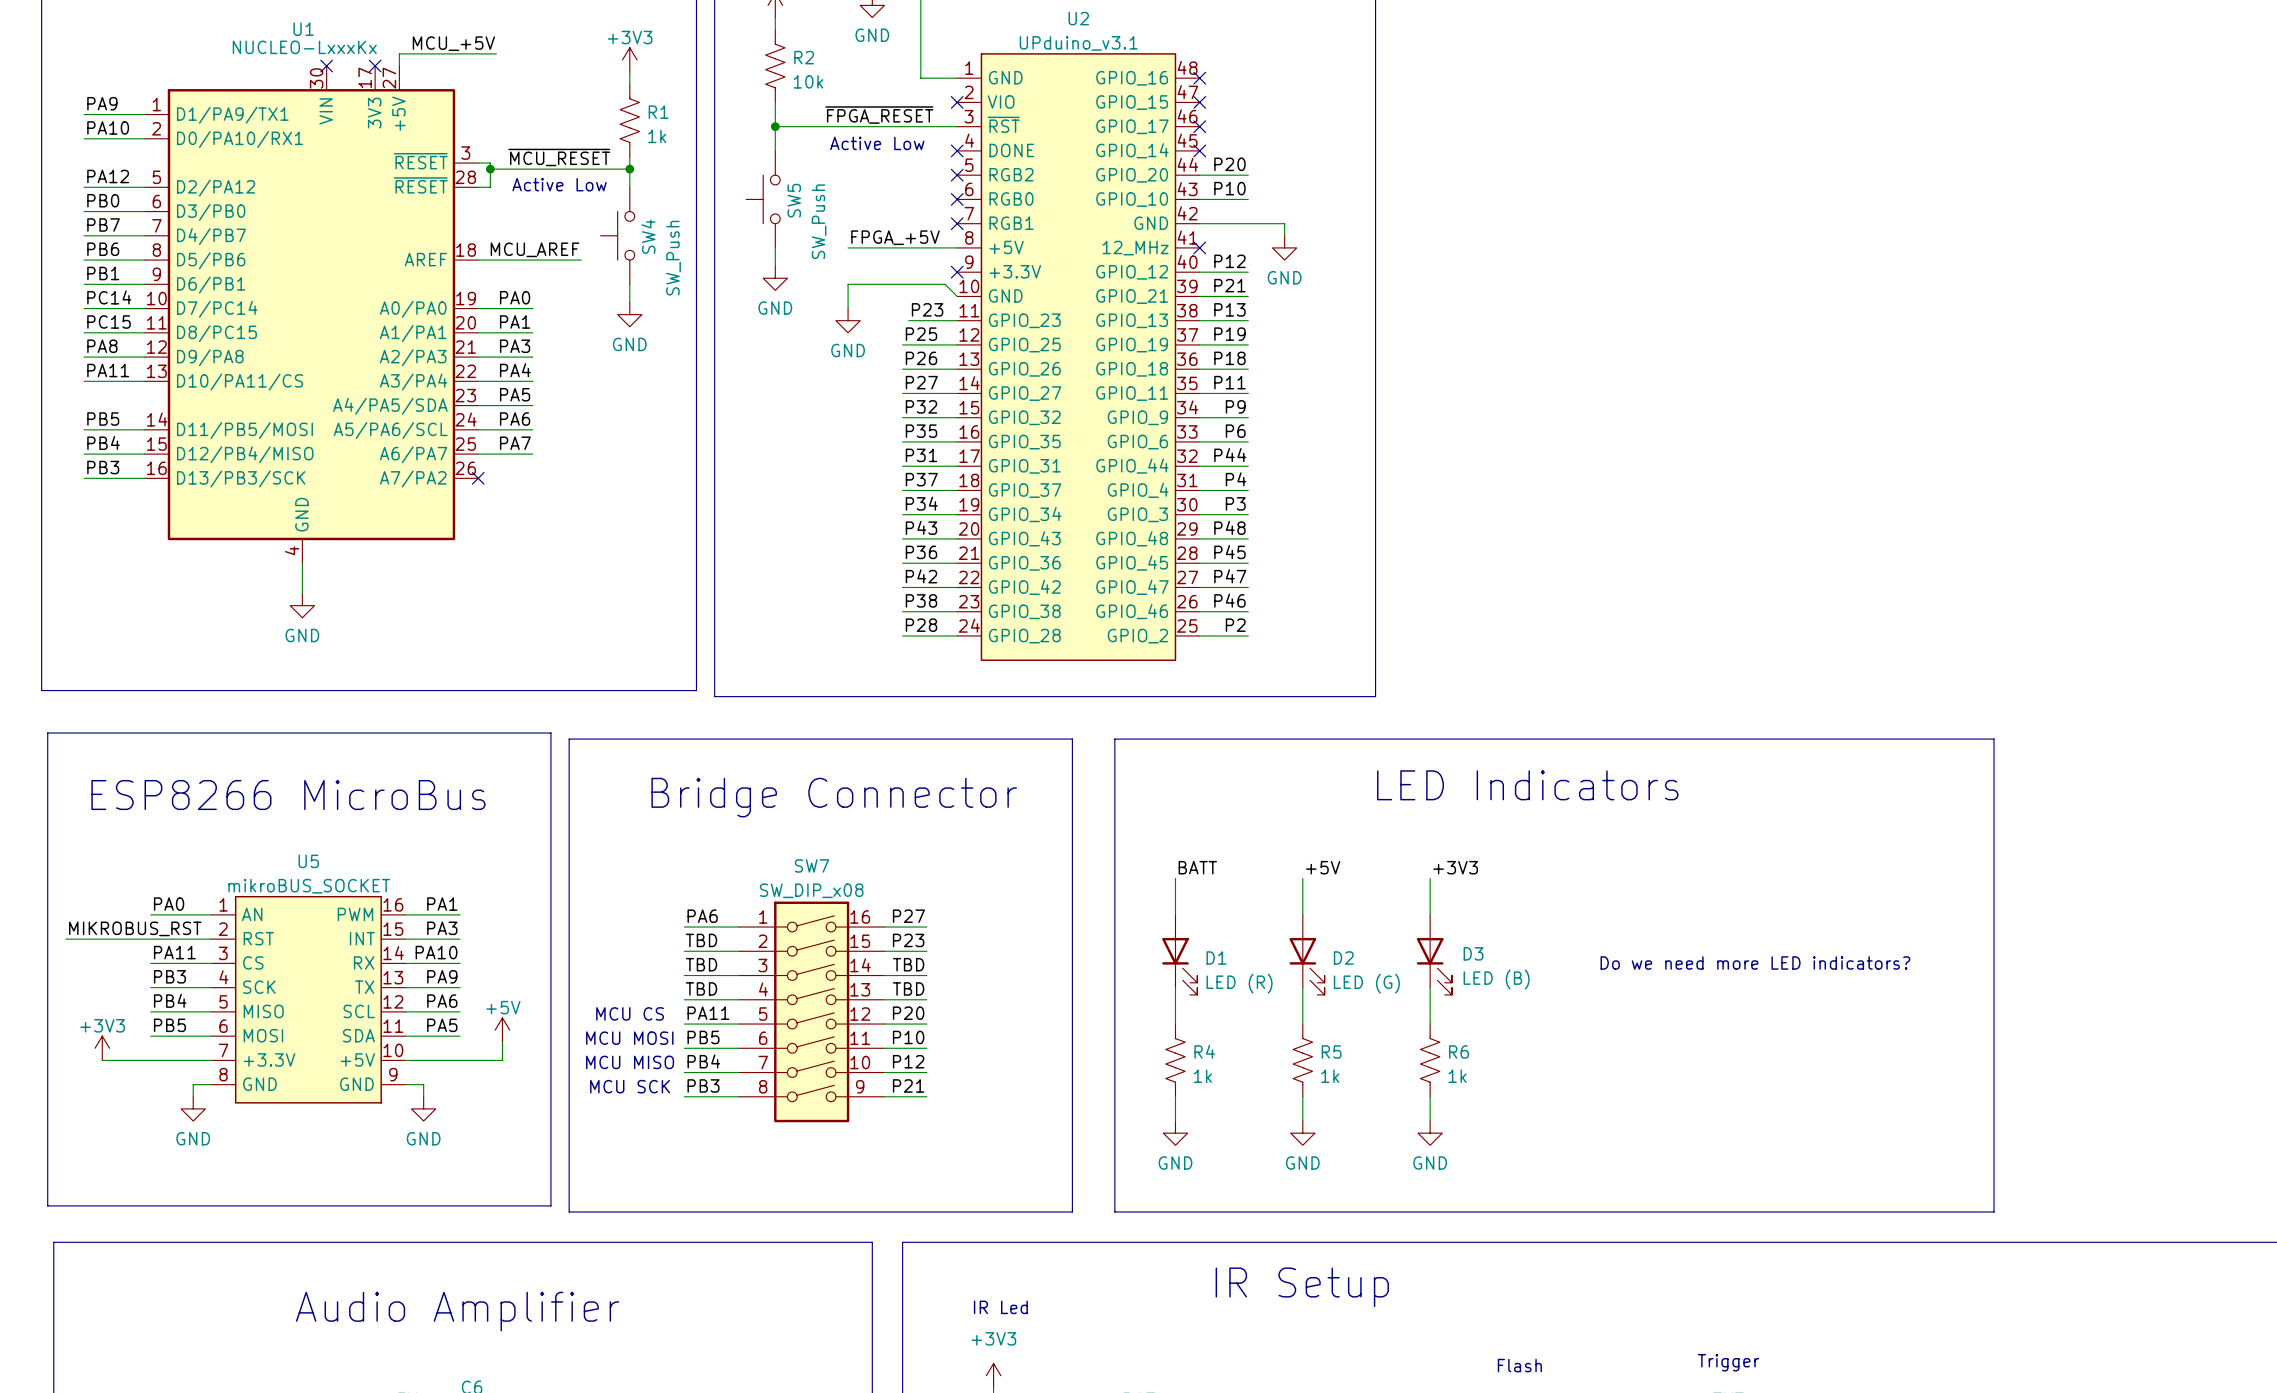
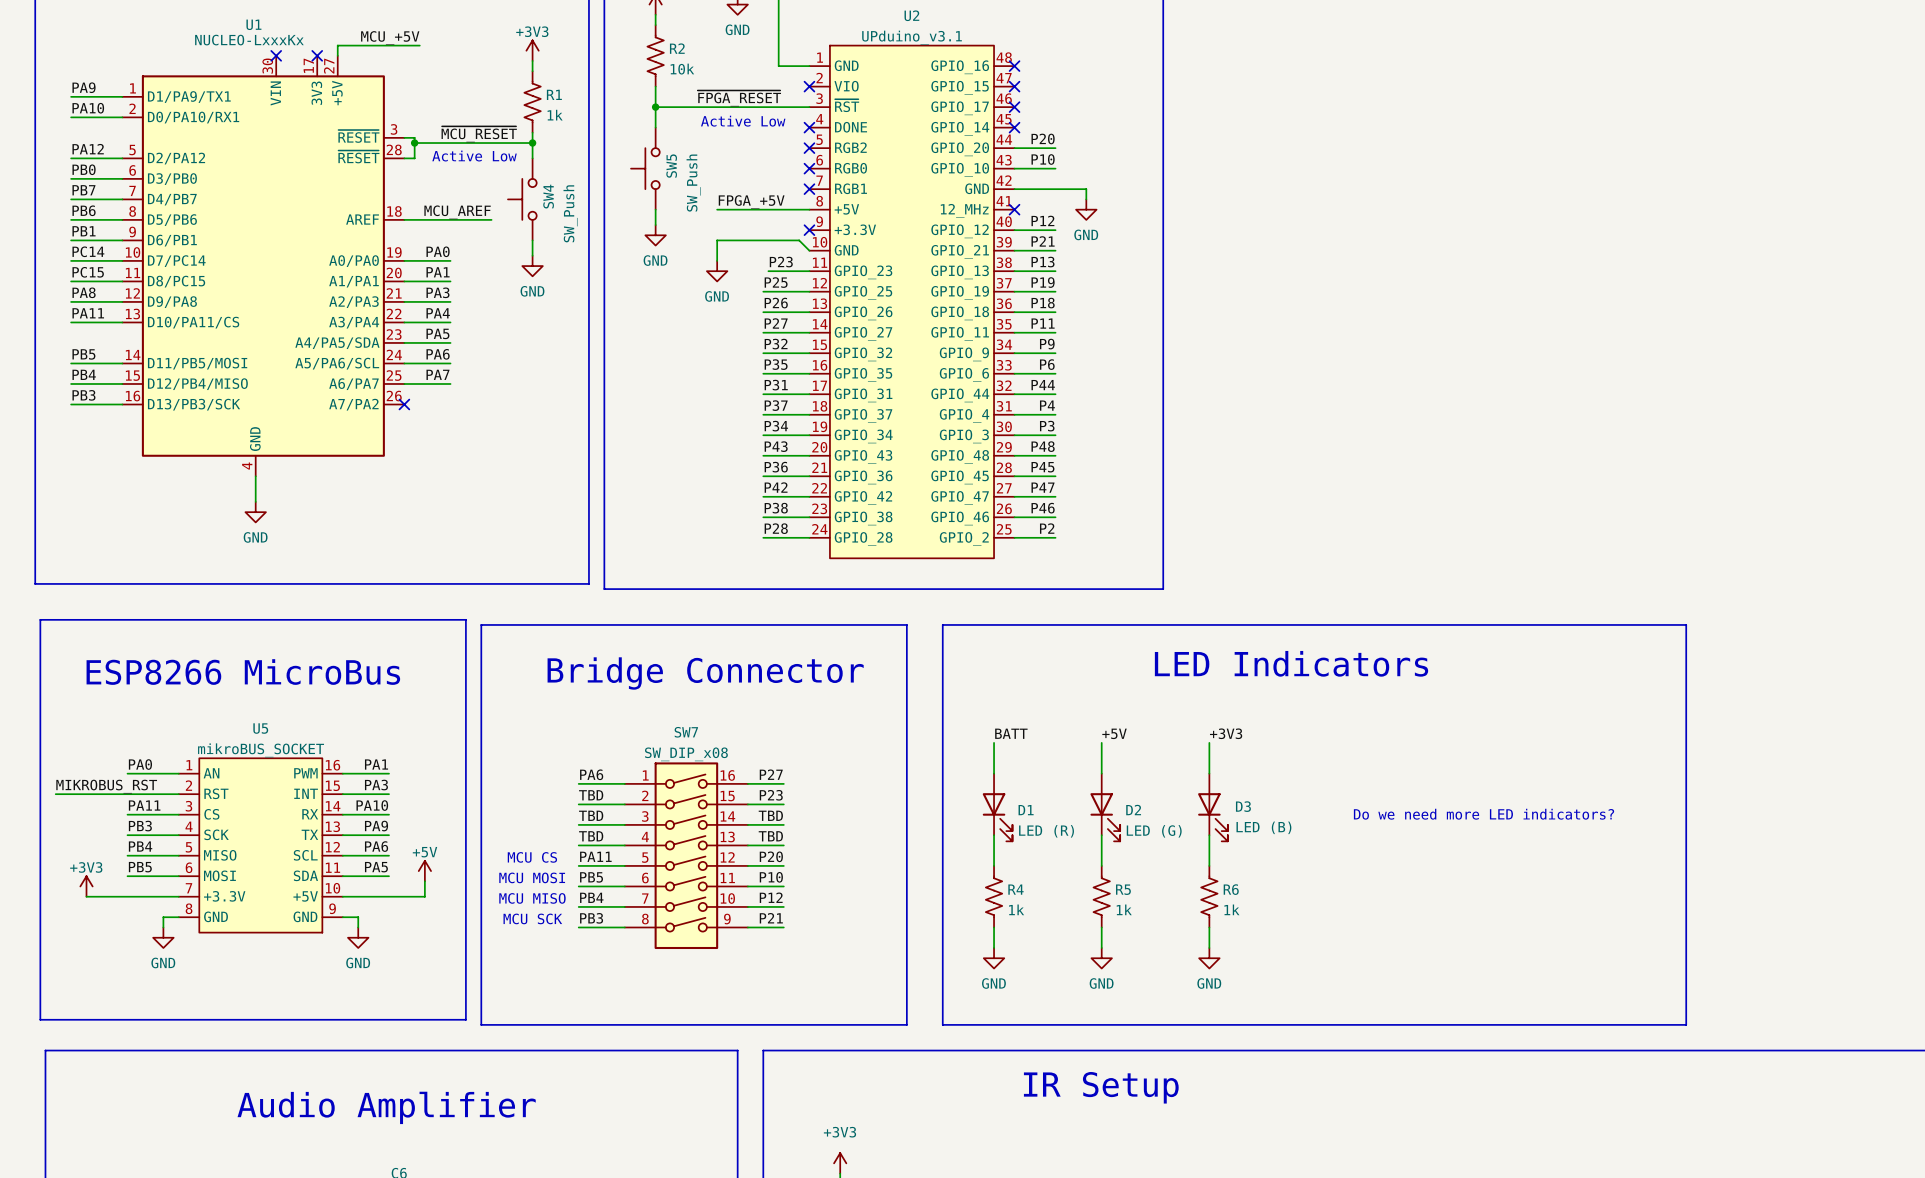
text: IR Led (1000, 1307) -> none
text: Trigger (1728, 1362) -> none
text: Flash (1519, 1365) -> none

